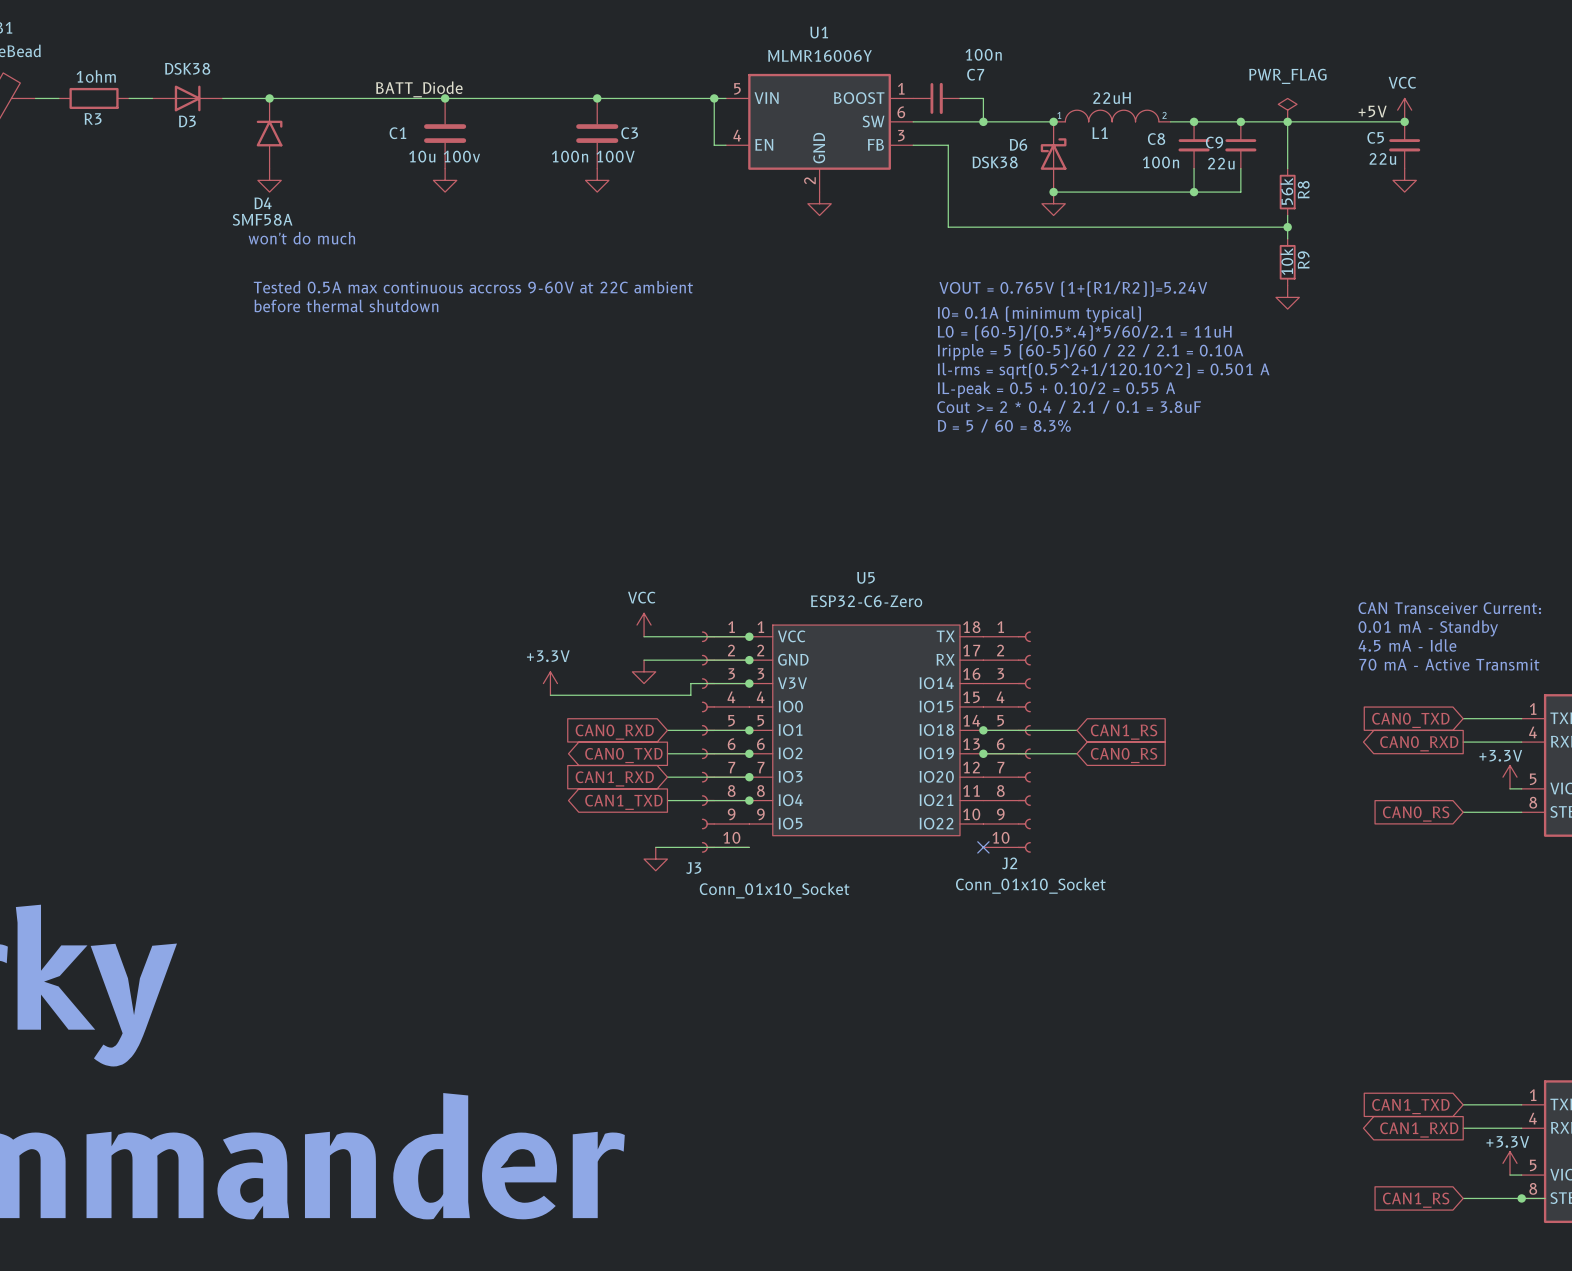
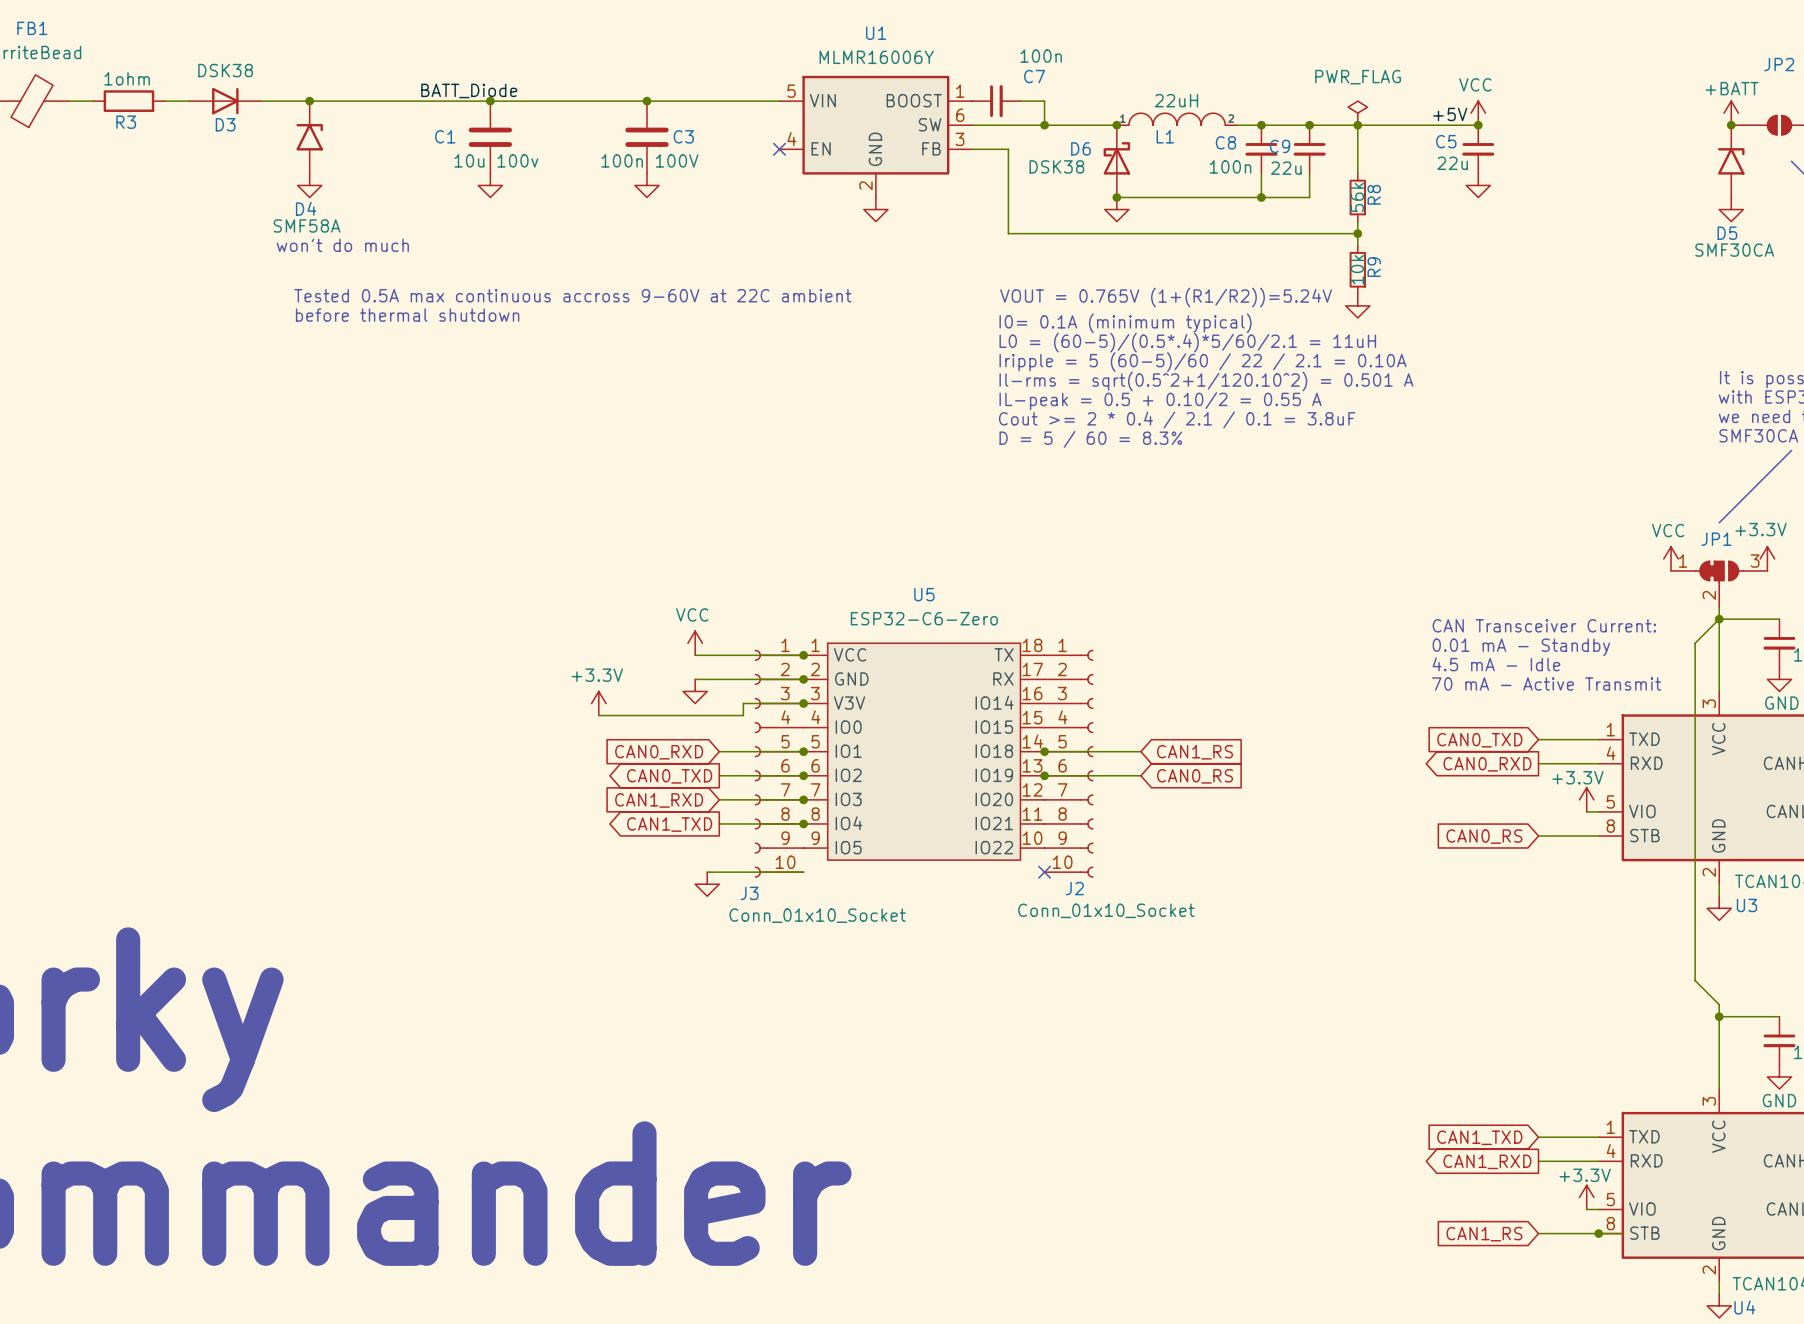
wire: (714, 98) (714, 145) (725, 145) -> none
junction: (714, 98) -> none
no-connect mark: none -> (779, 149)

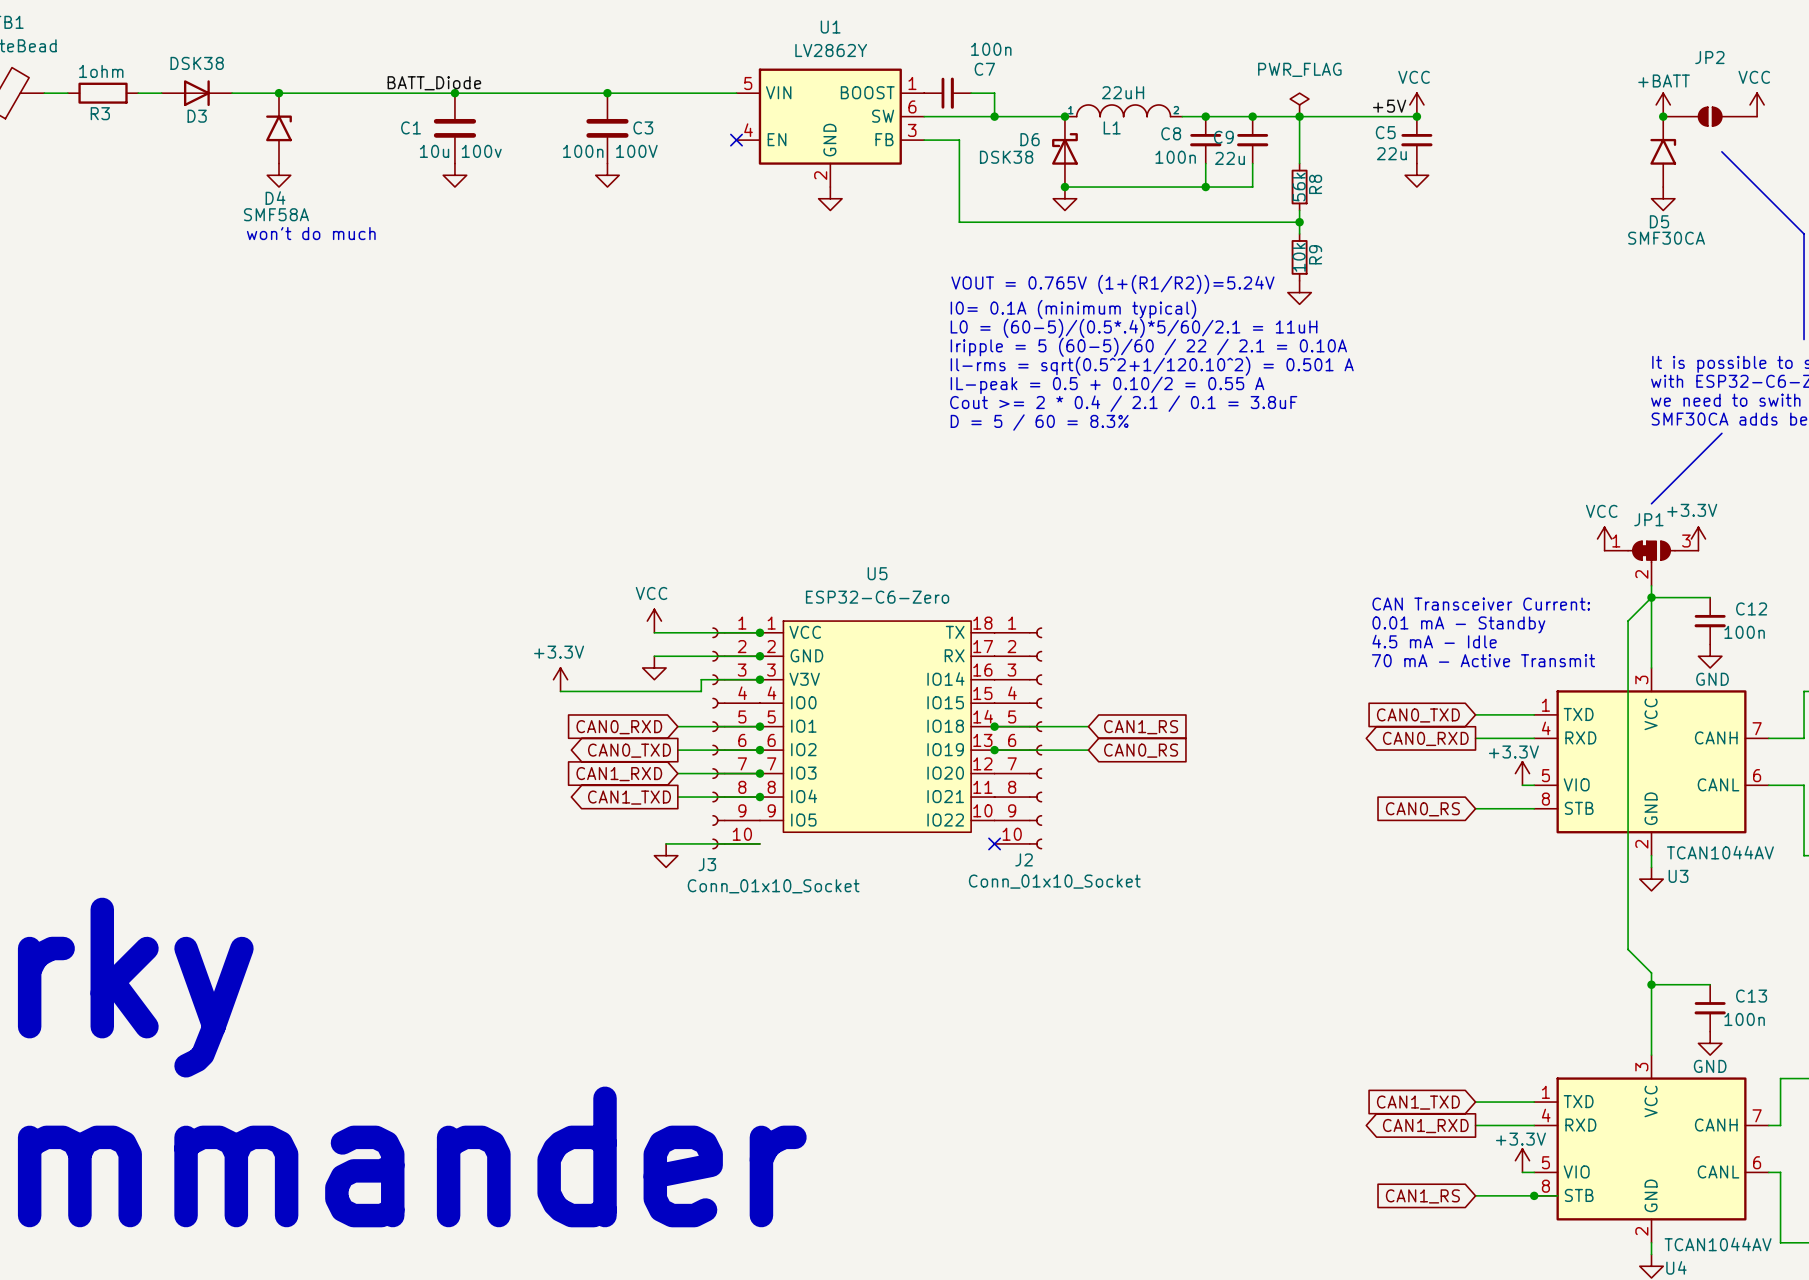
U1 value: MLMR16006Y (876, 57) -> LV2862Y (831, 50)
text: Tested 0.5A max continuous accross 9-60V at 22C ambient (572, 295) -> none
text: before thermal shutdown (407, 315) -> none

